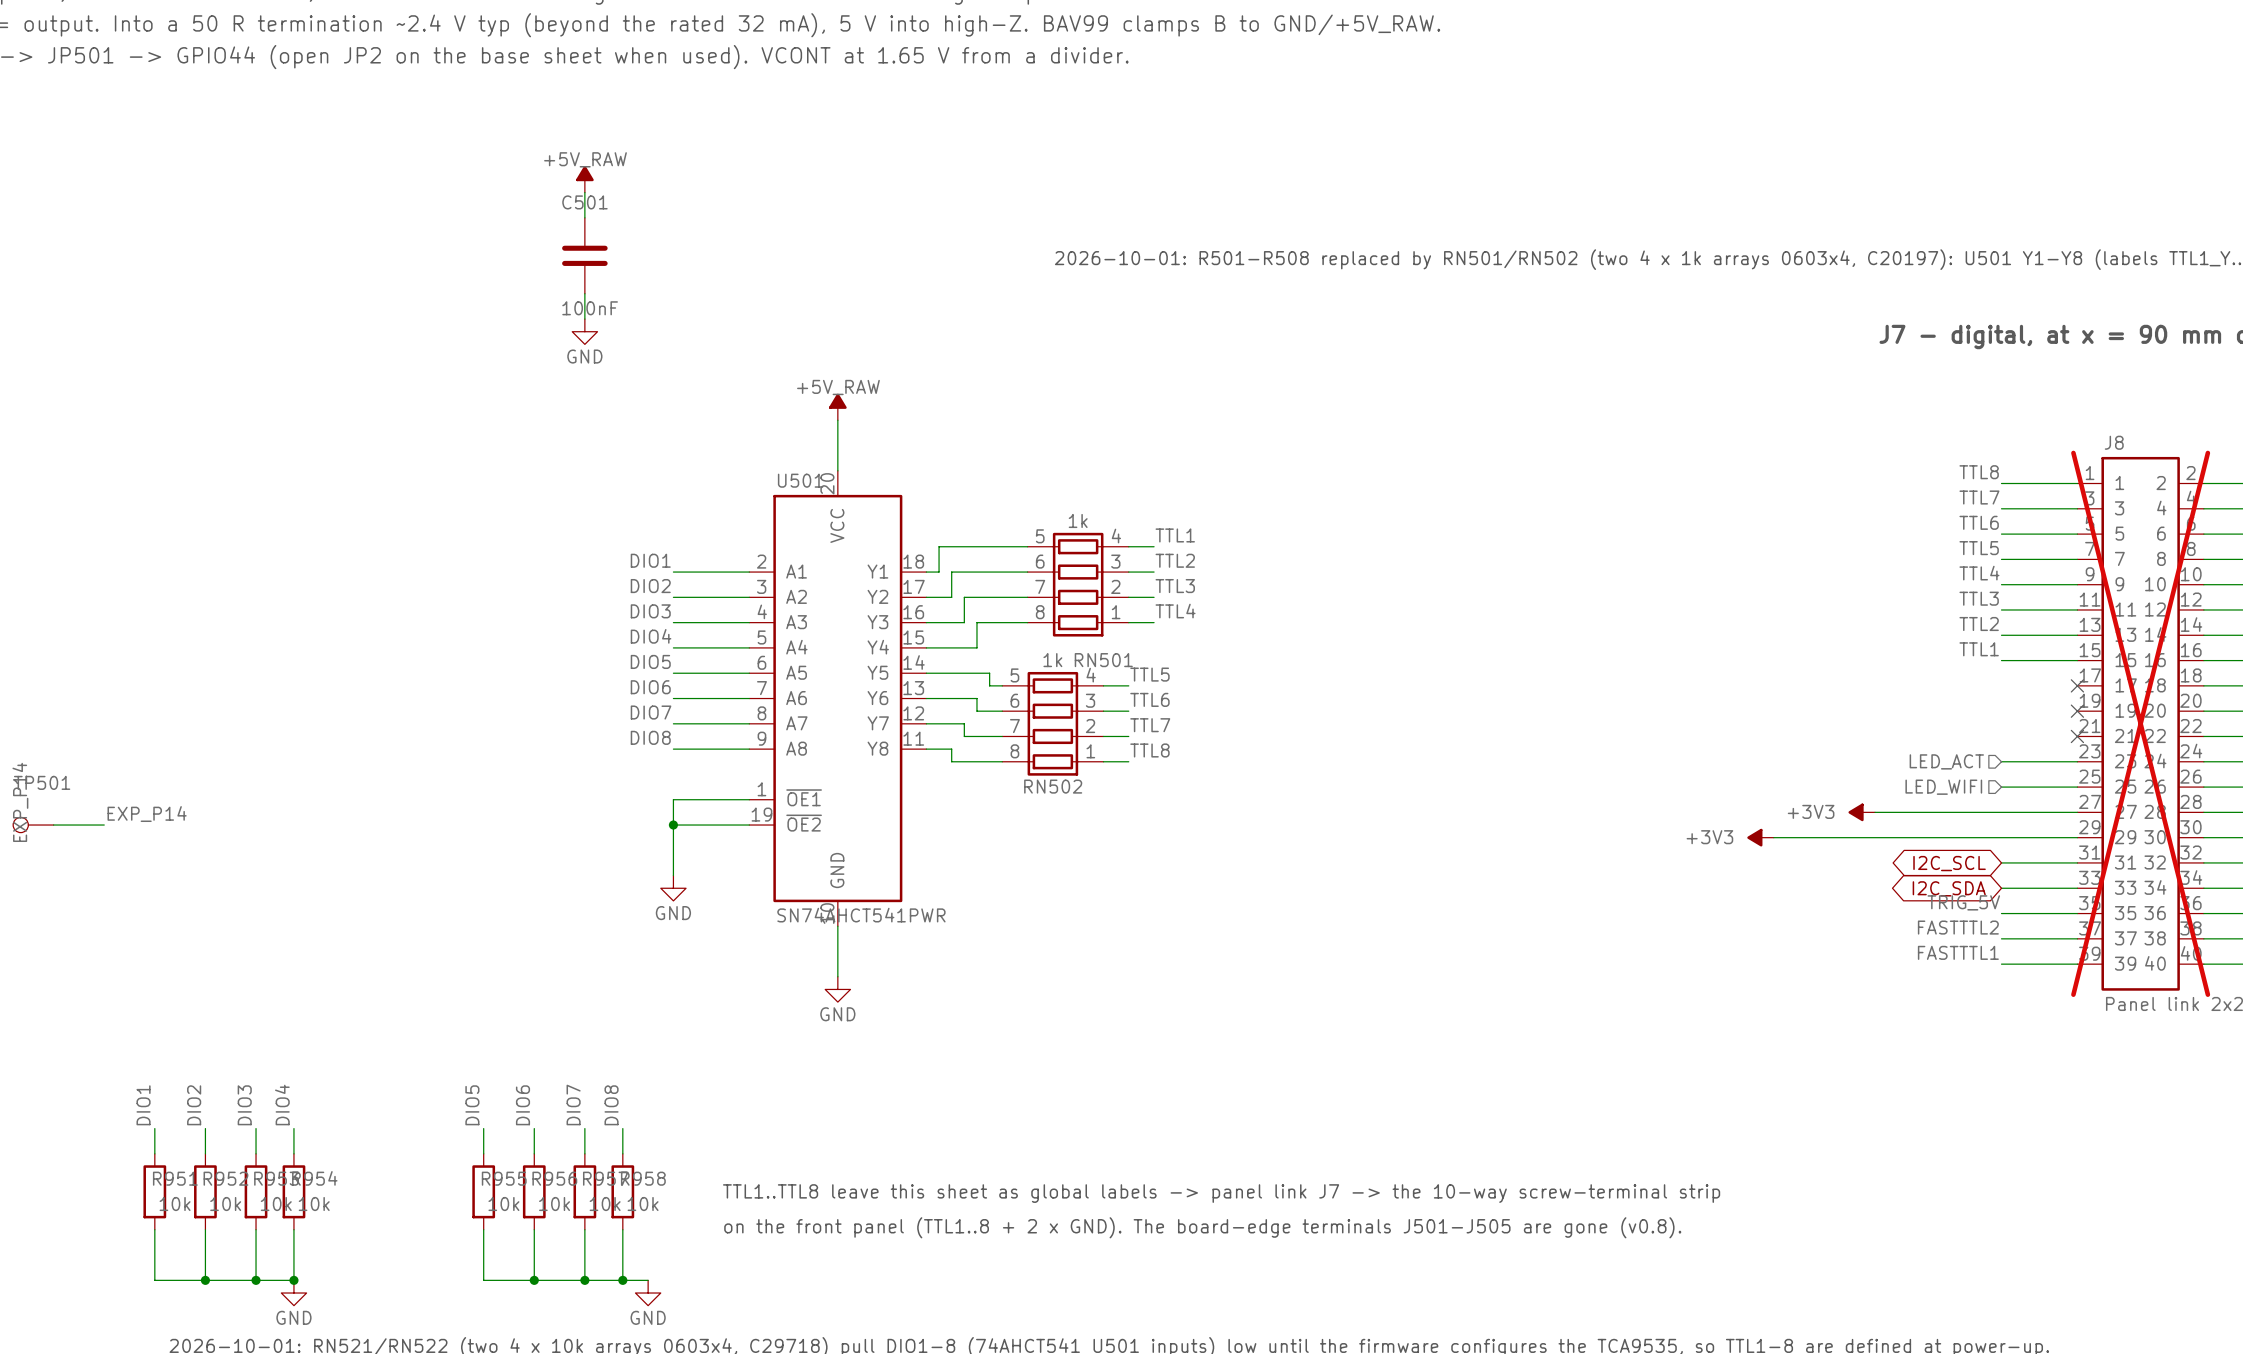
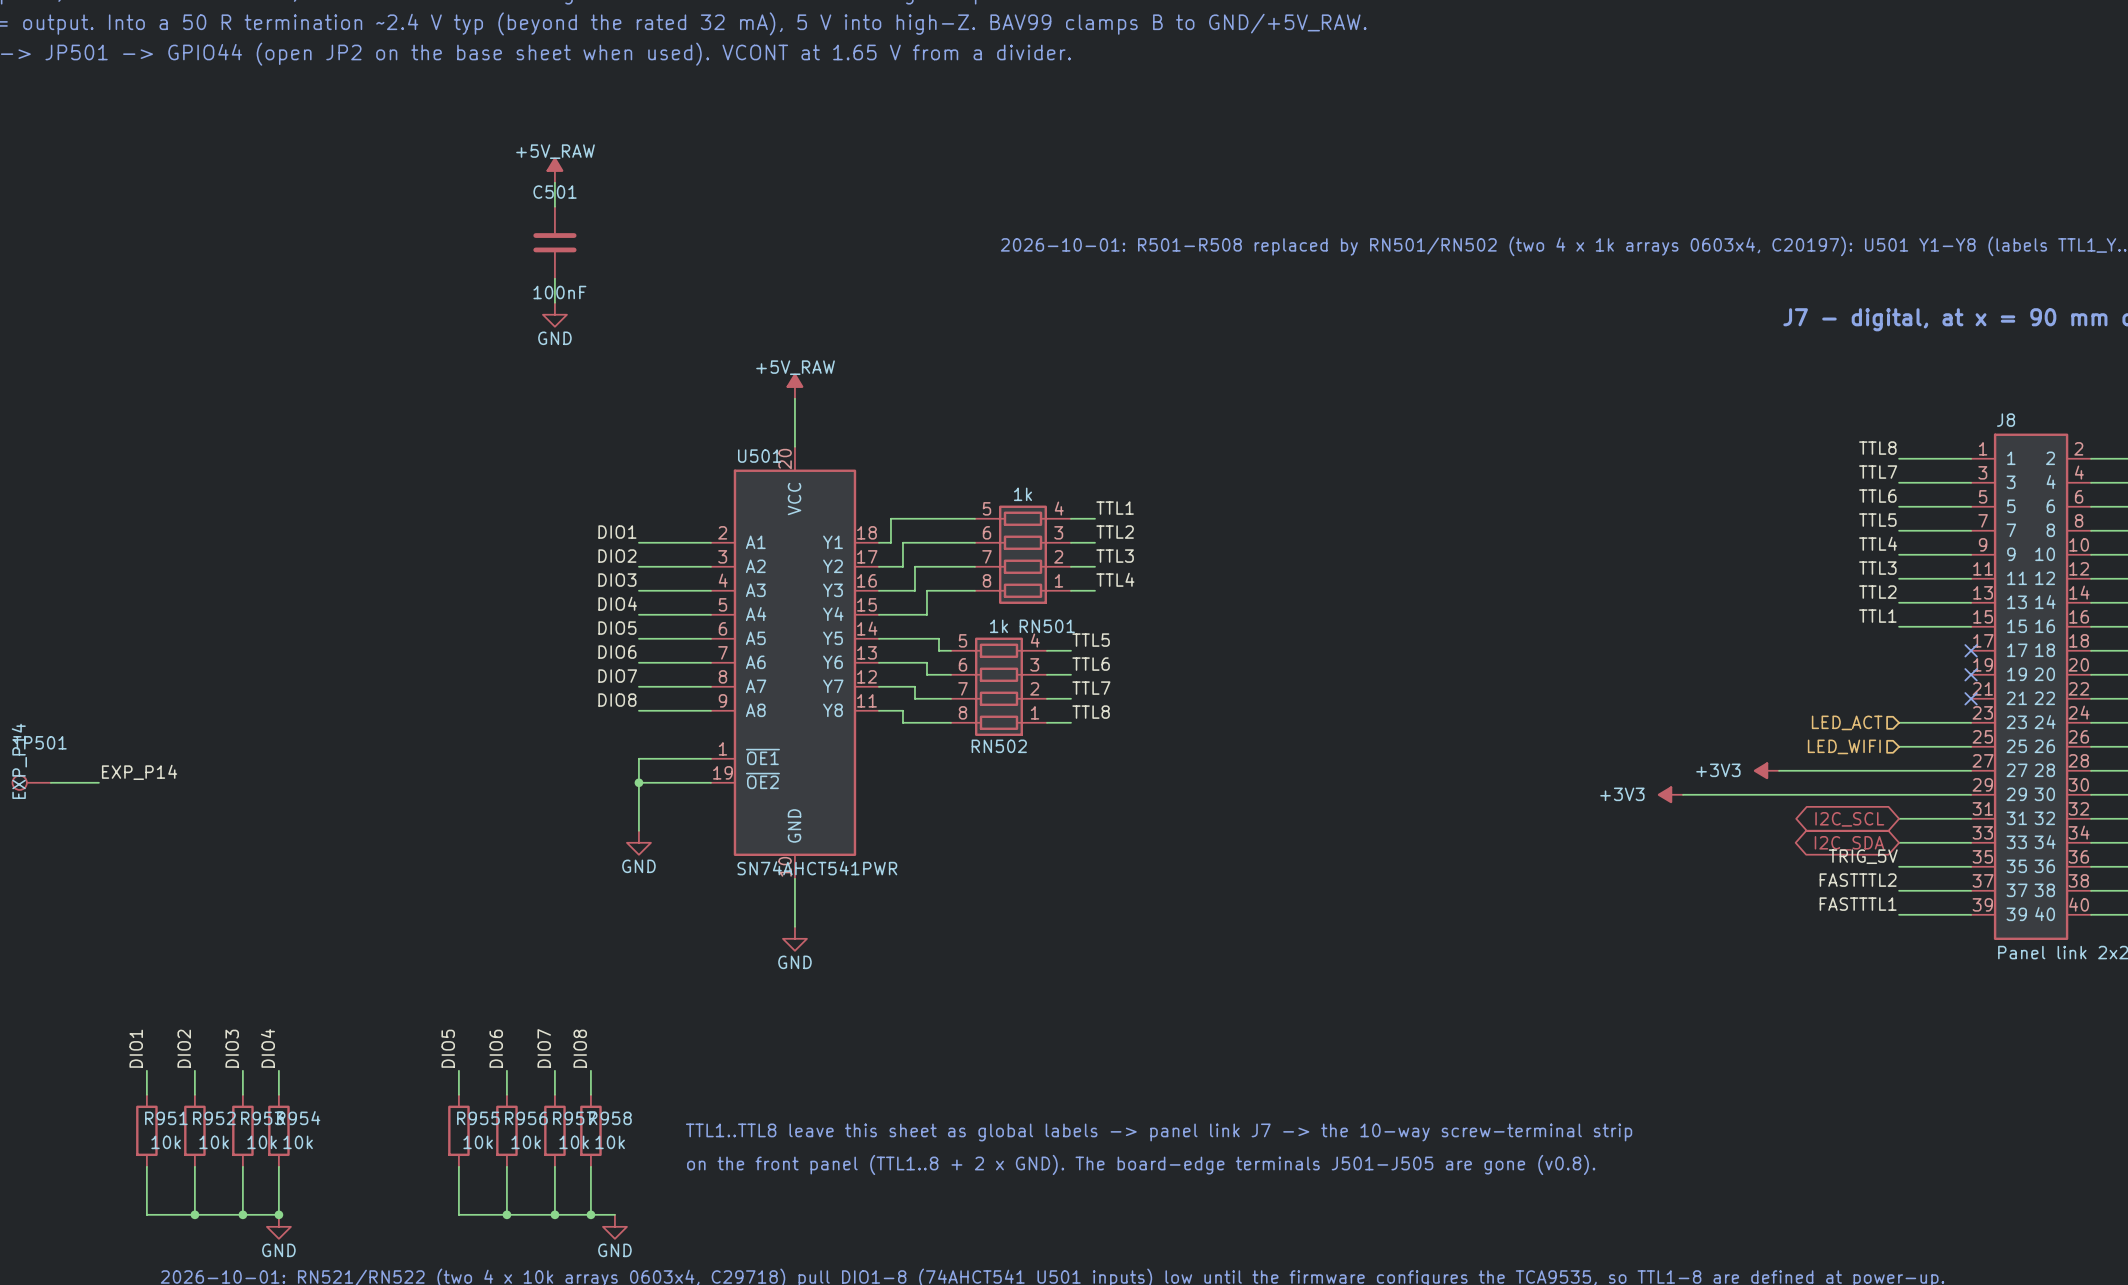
J8 do-not-place cross: (2140, 723) -> none

